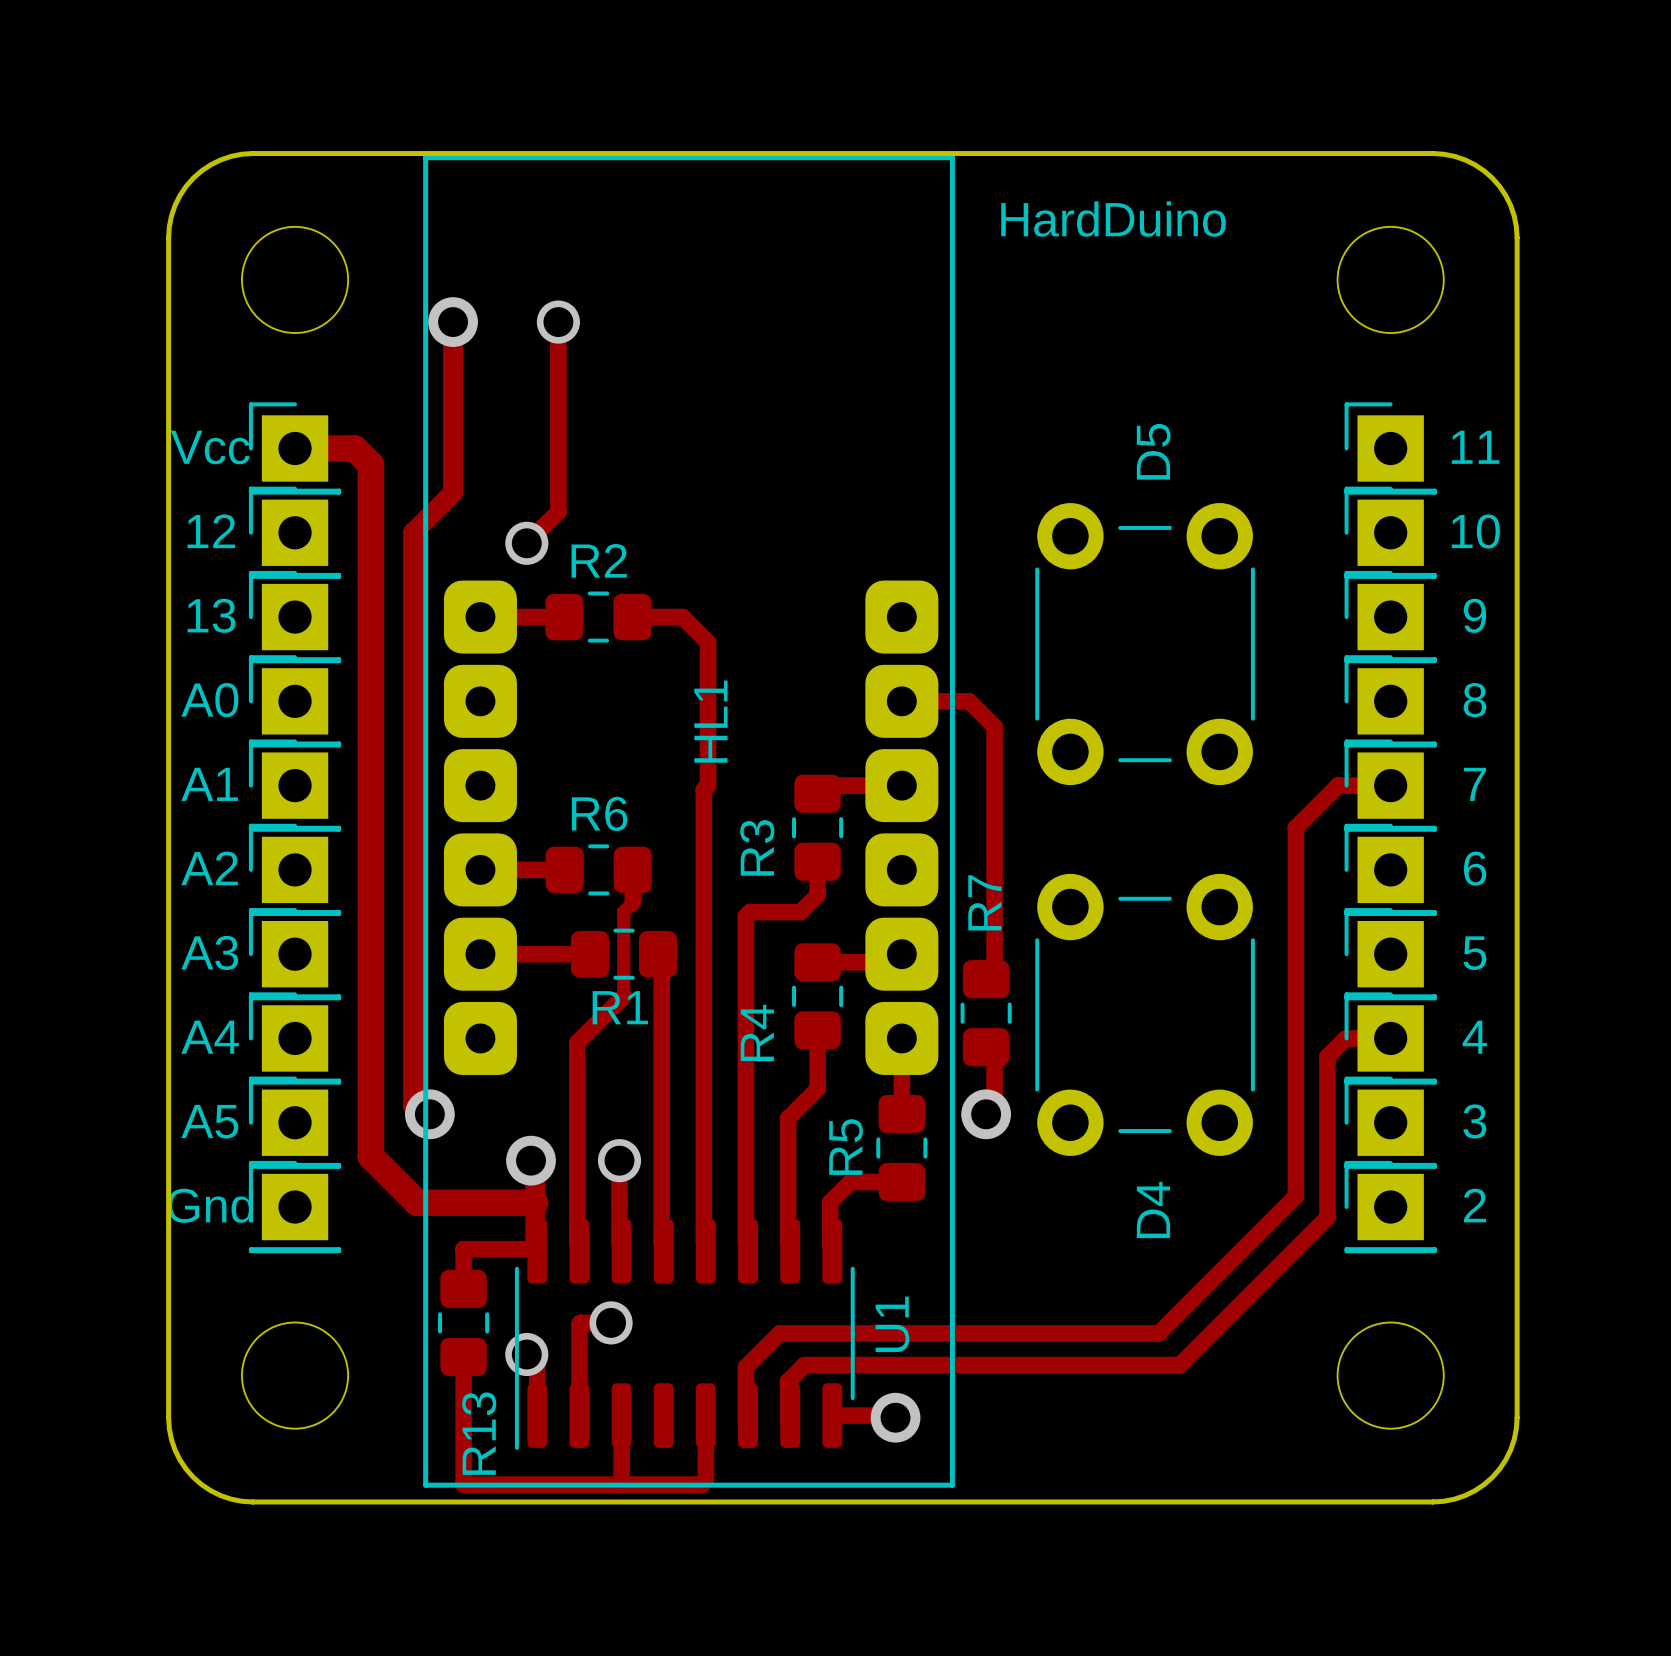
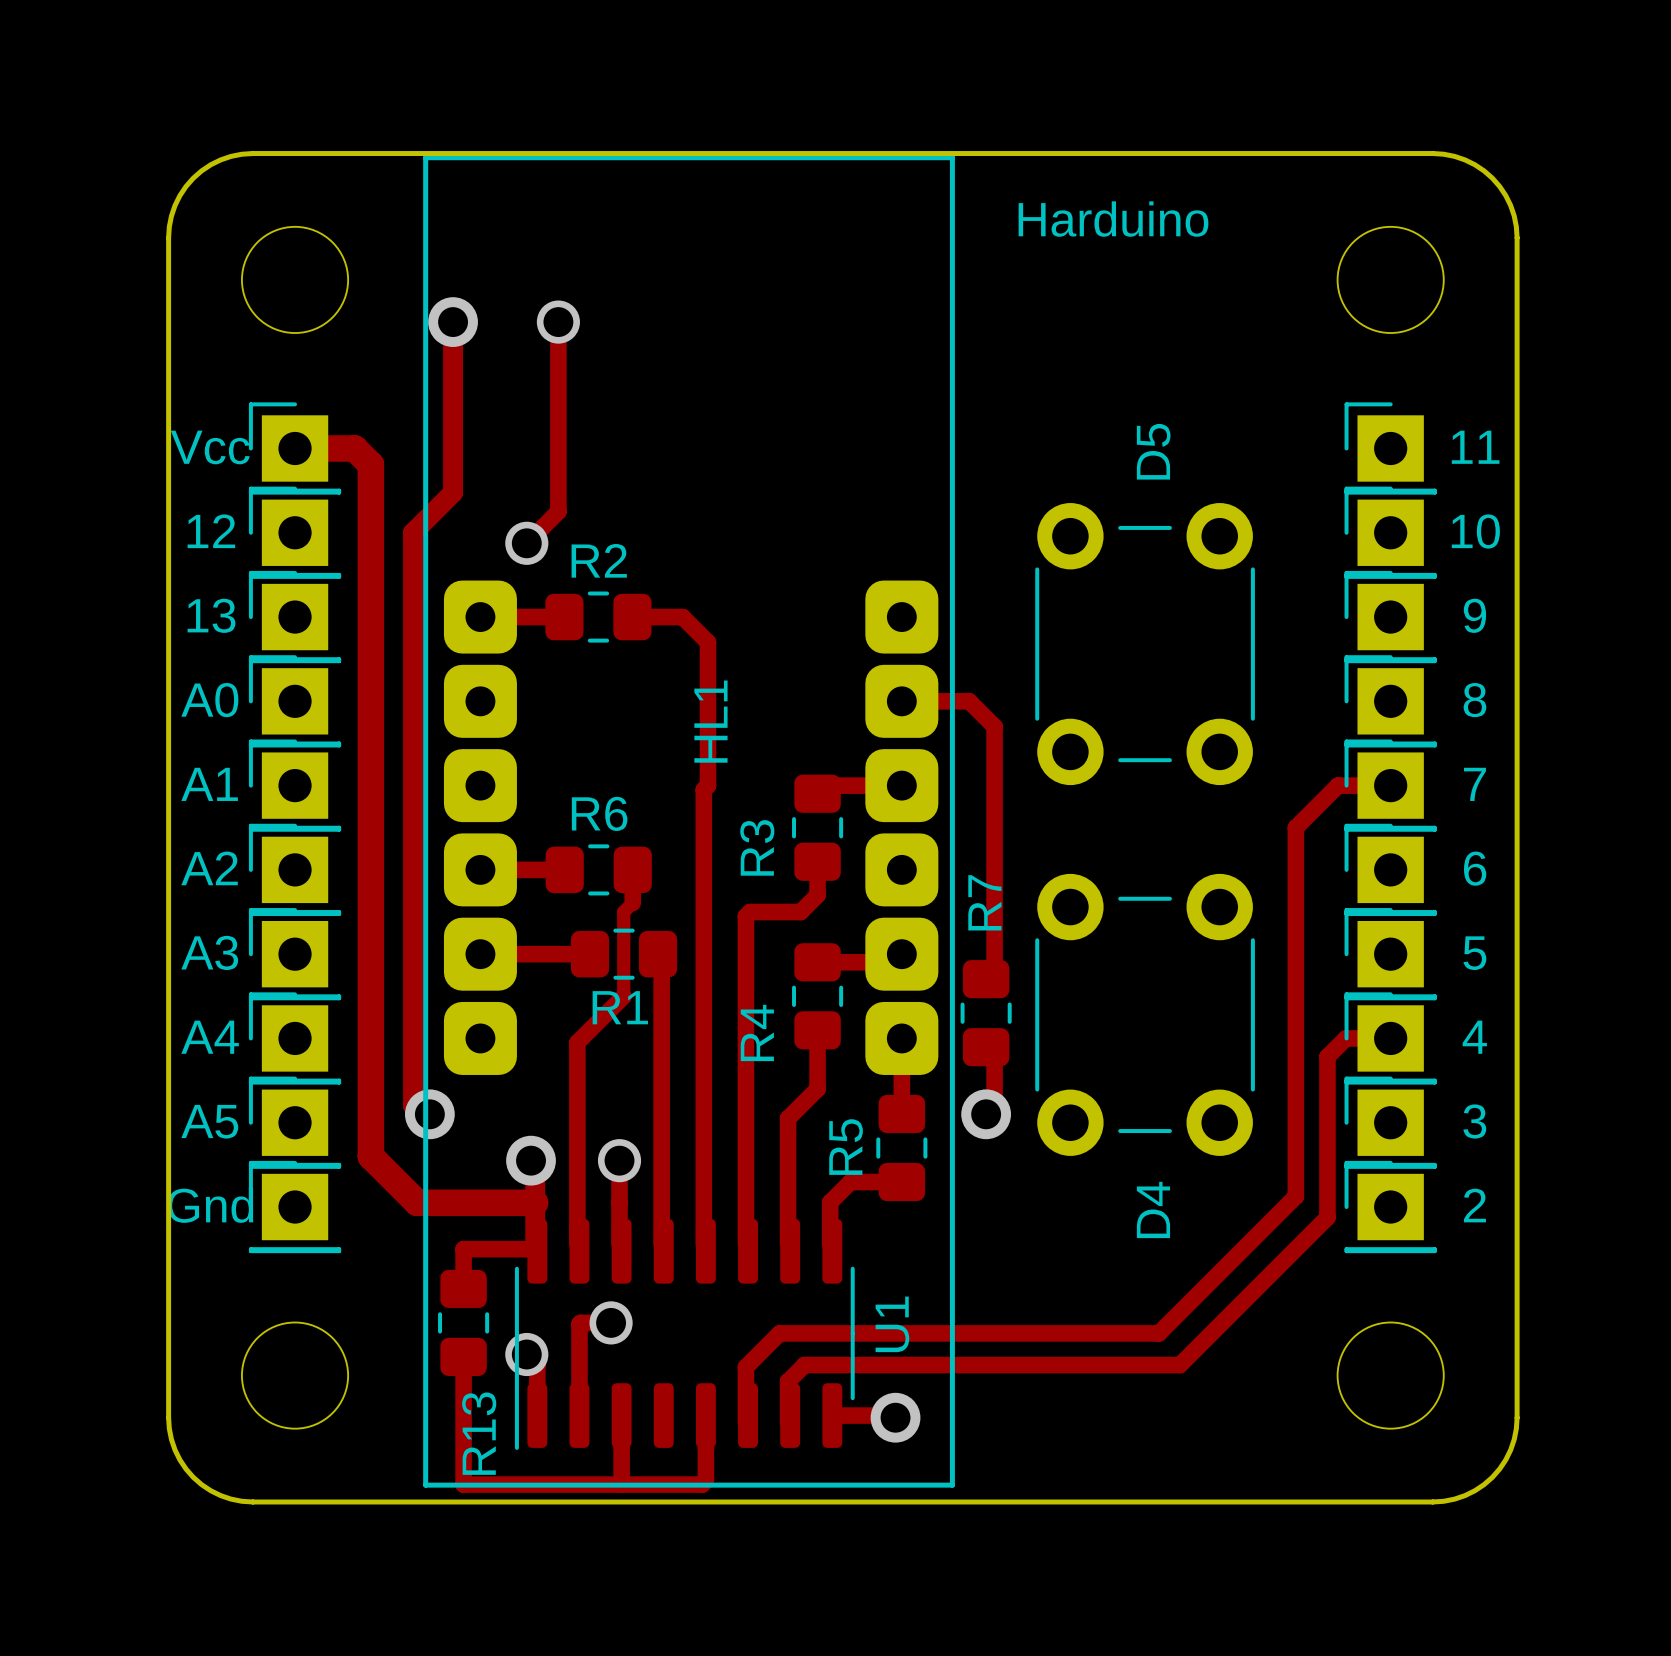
text: HardDuino (1113, 219) -> Harduino (1113, 219)

